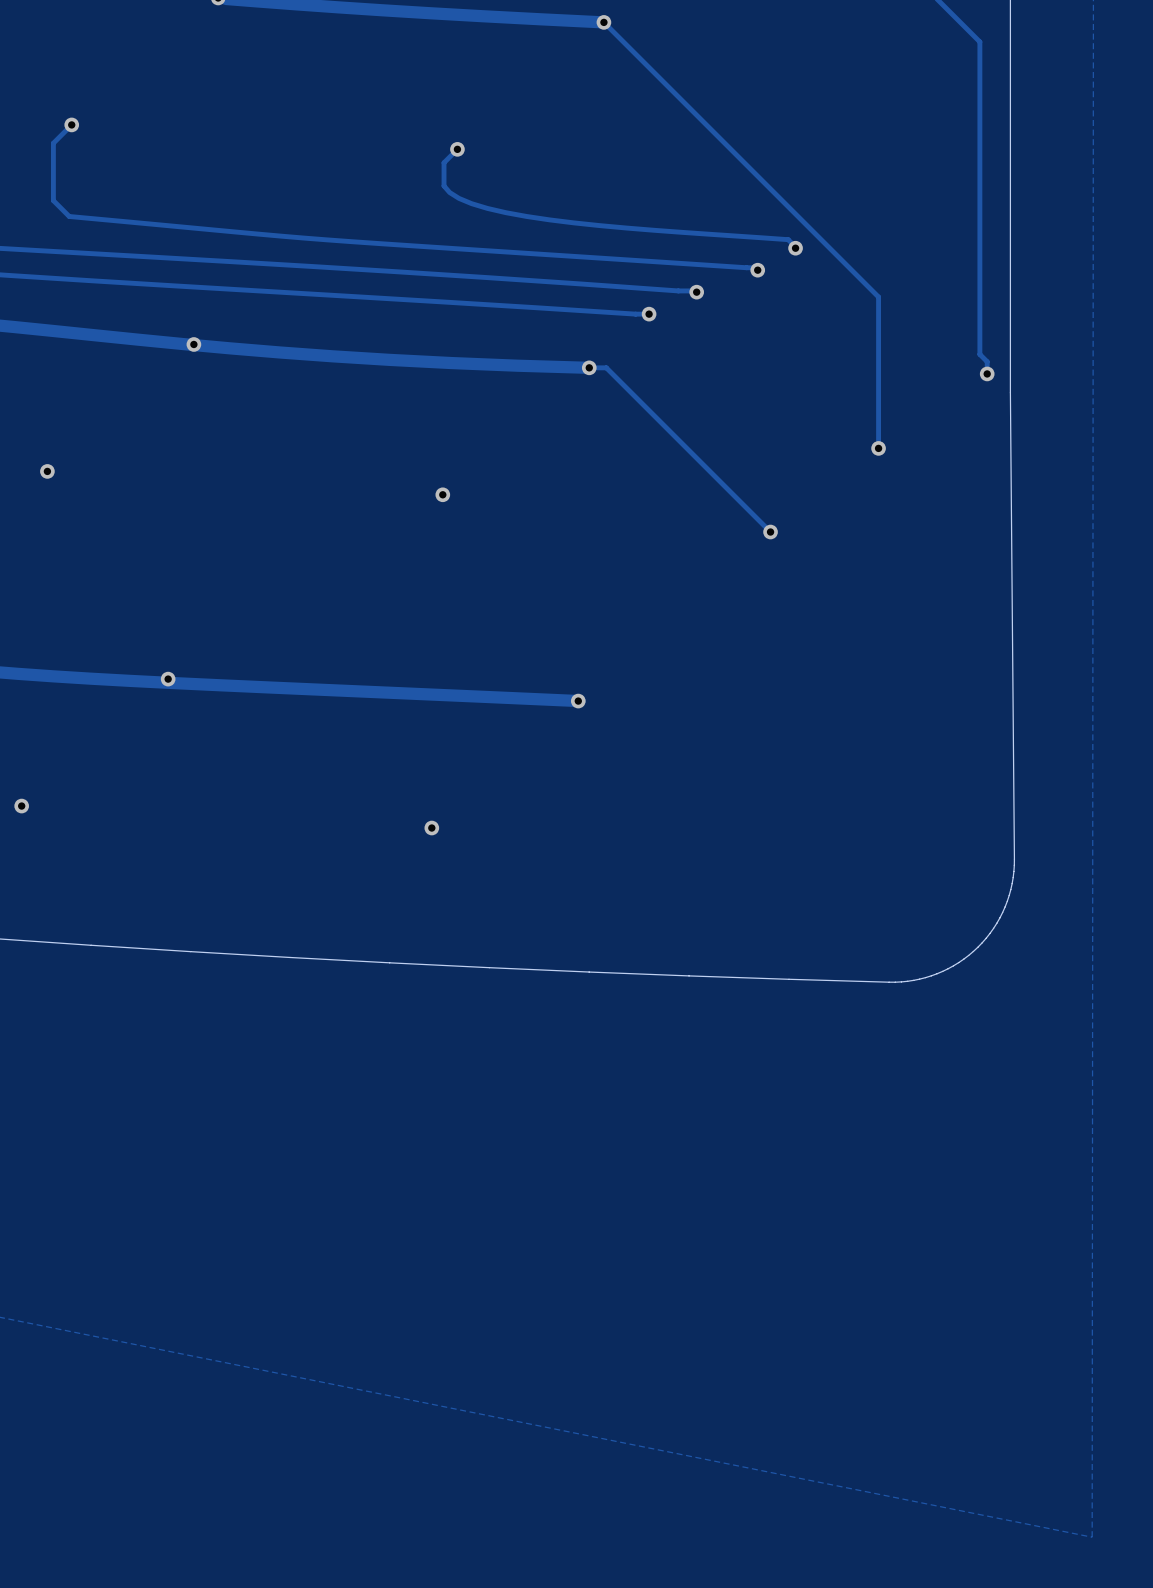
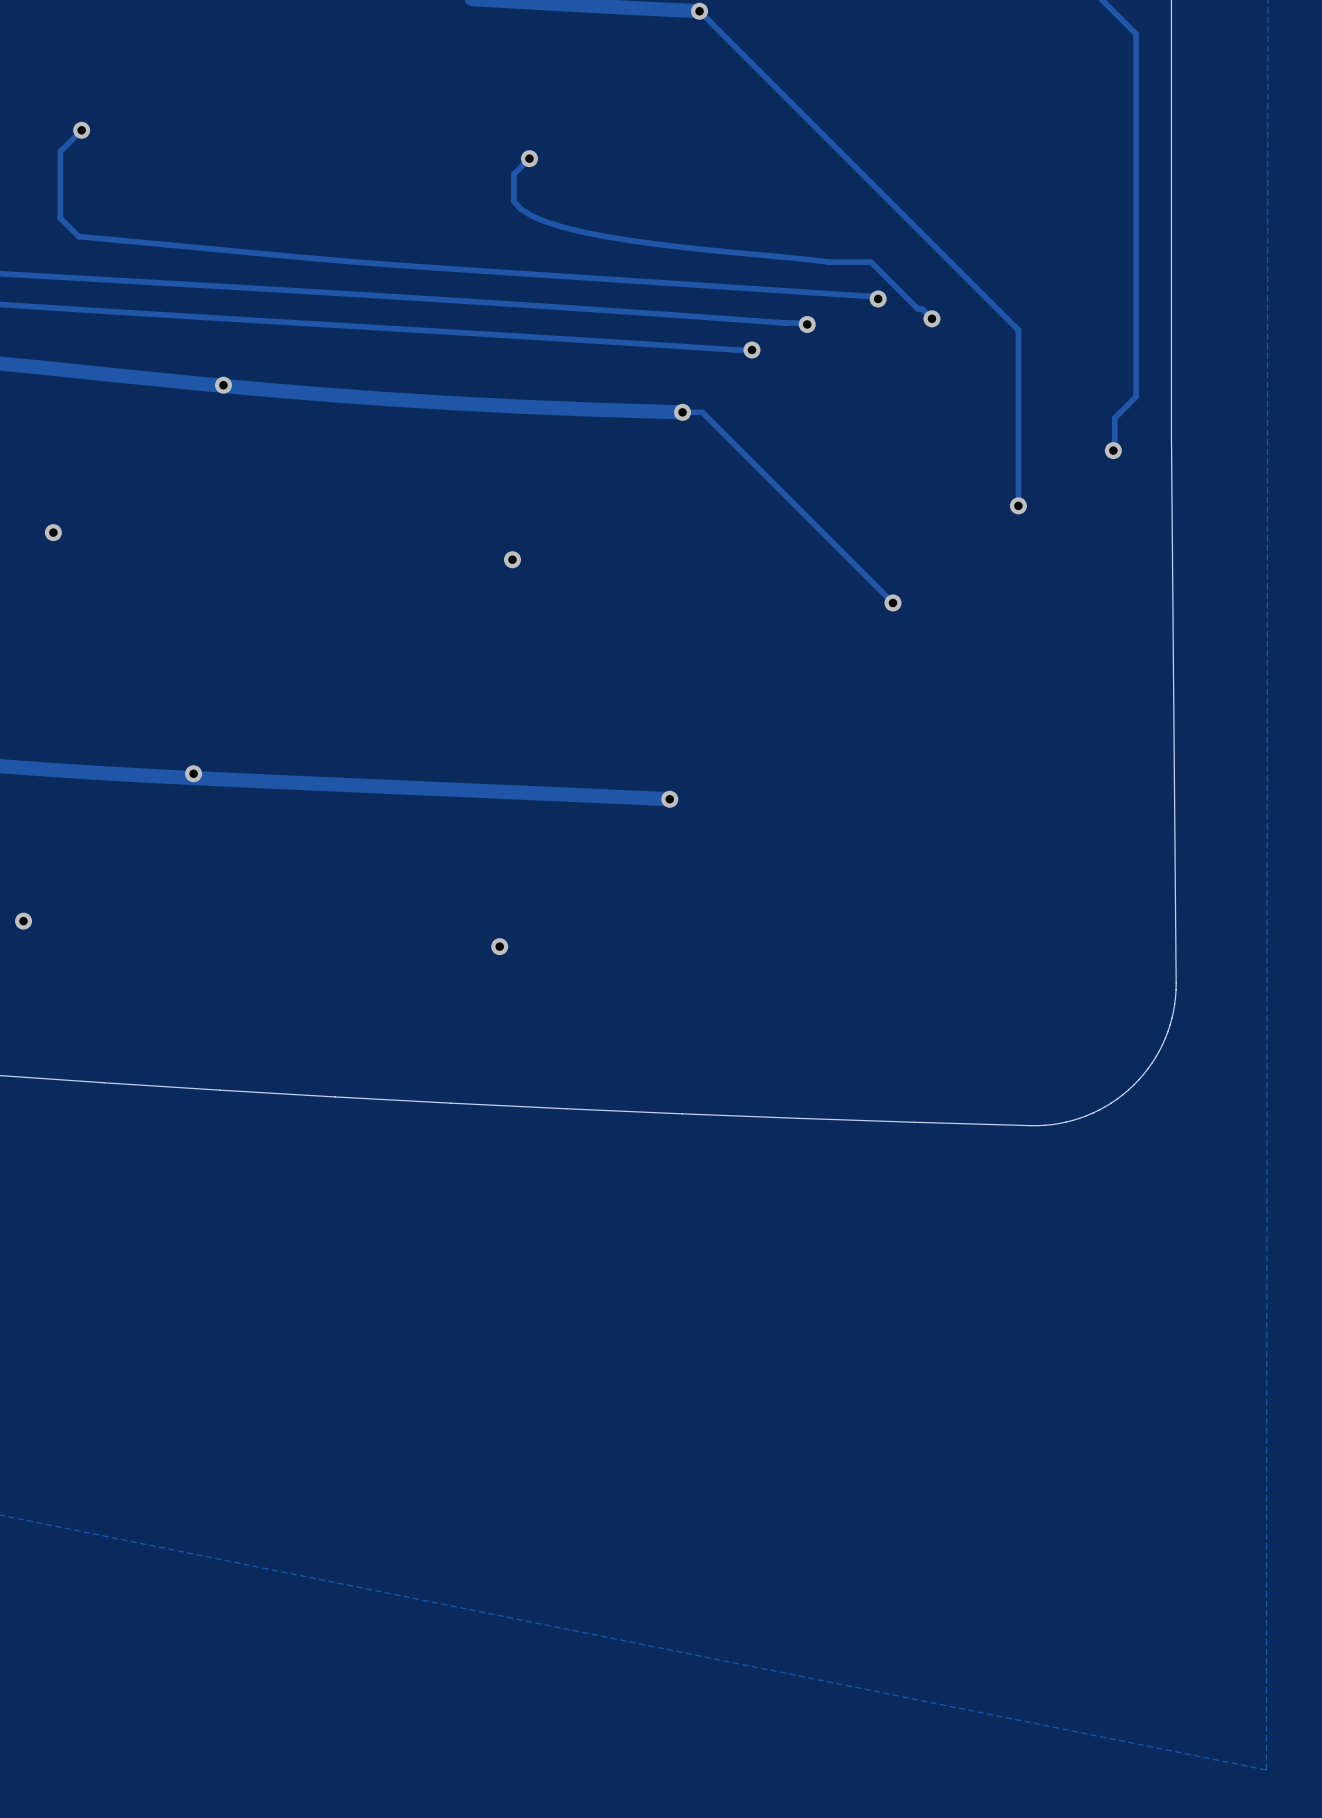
track: (444, 185) (449, 192) (471, 203) (526, 216) (626, 228) (788, 239) (795, 248) -> (513, 201) (520, 208) (545, 221) (605, 236) (679, 246) (828, 262) (871, 262) (917, 308) (922, 308) (931, 318)
via position: (795, 248) -> (931, 318)
track: (979, 354) (987, 361) (987, 373) -> (1136, 396) (1114, 418) (1113, 450)
via position: (987, 373) -> (1113, 450)

